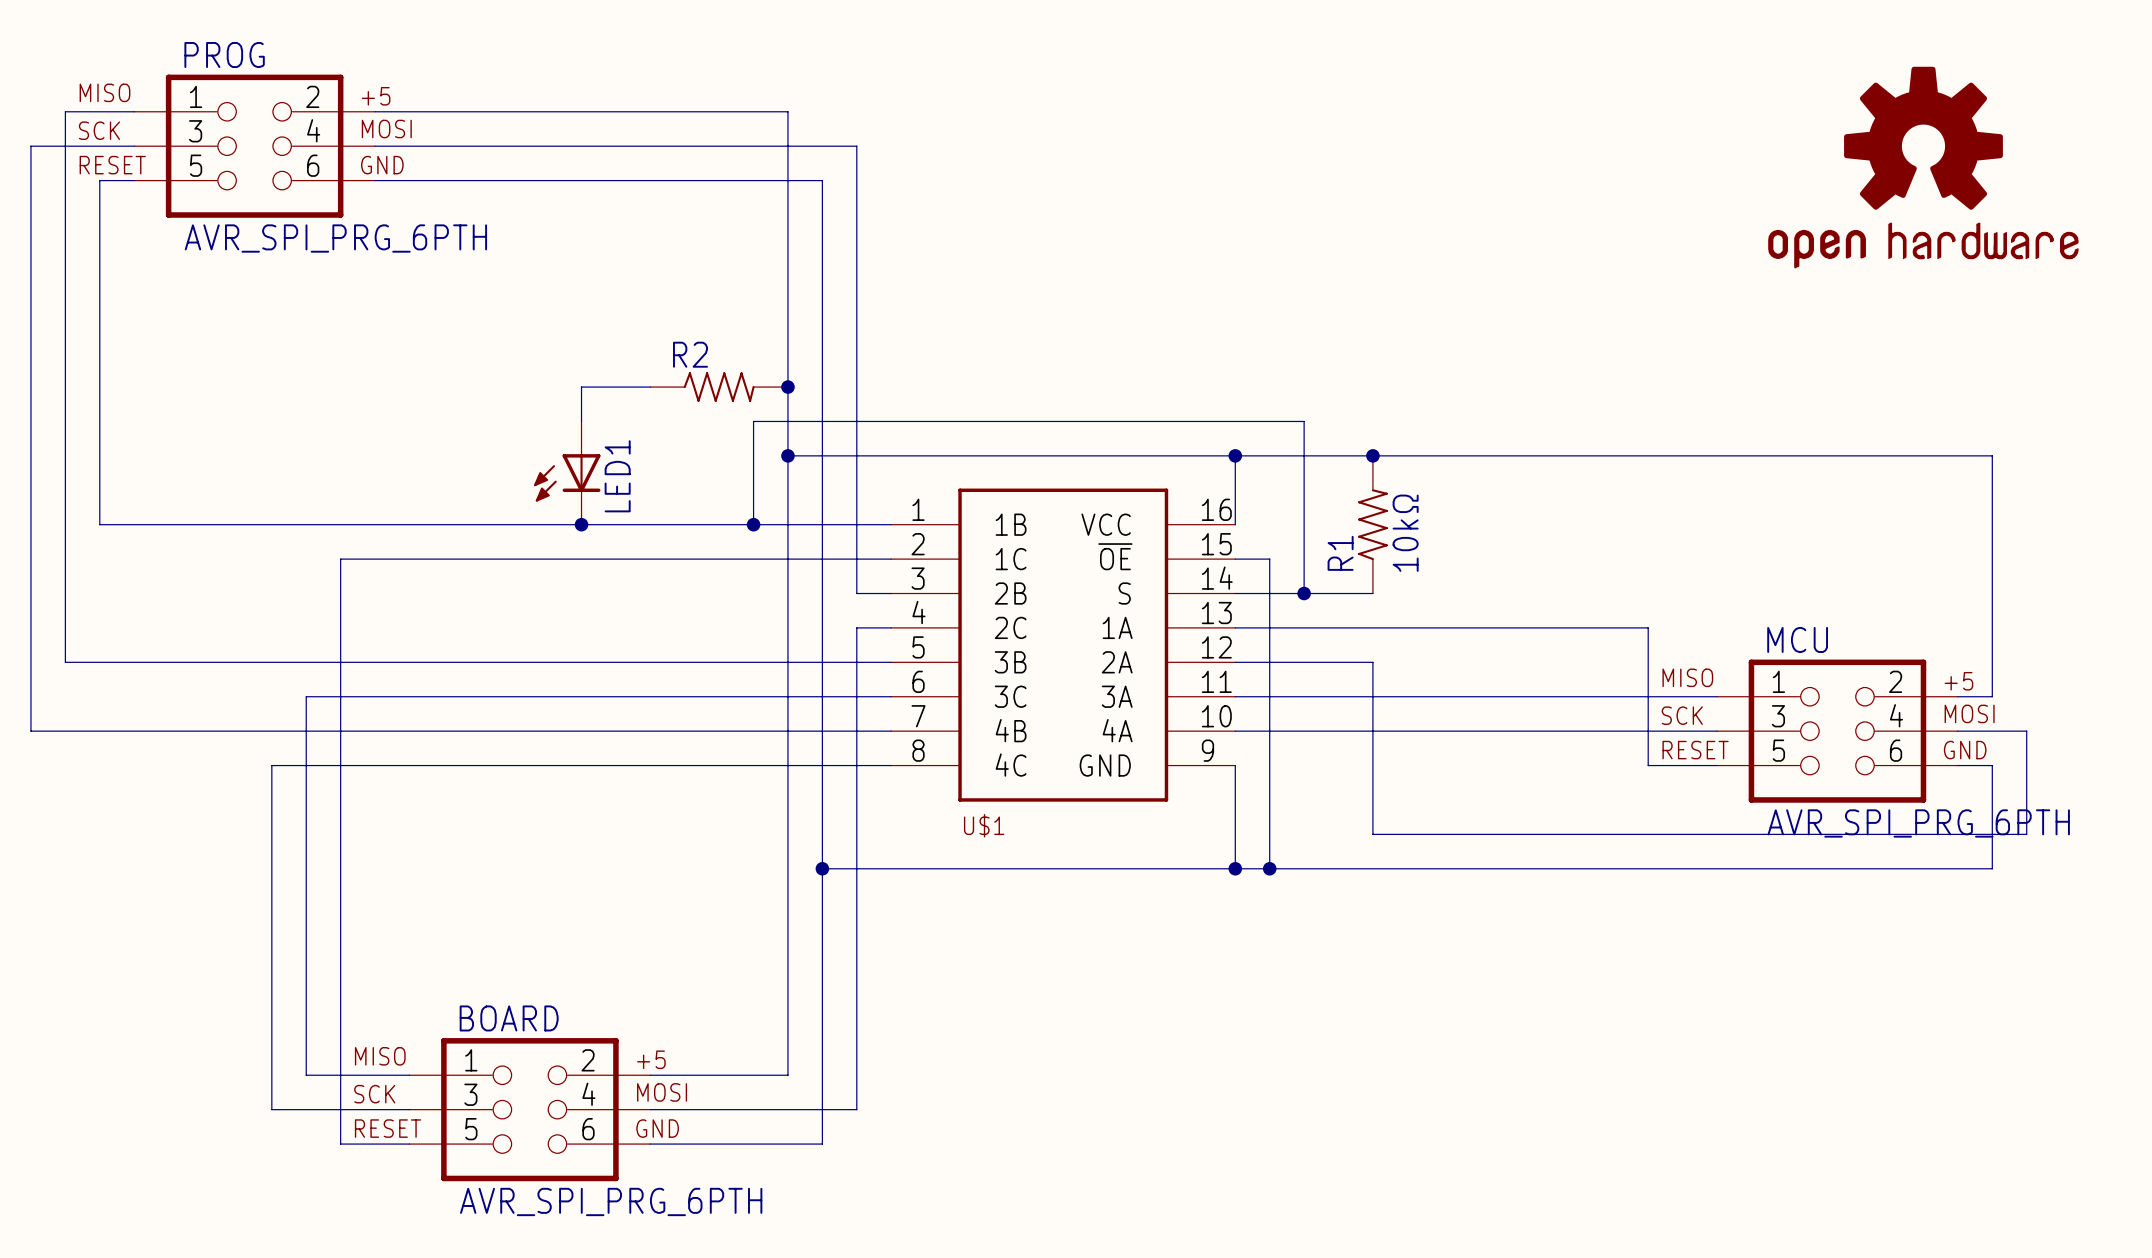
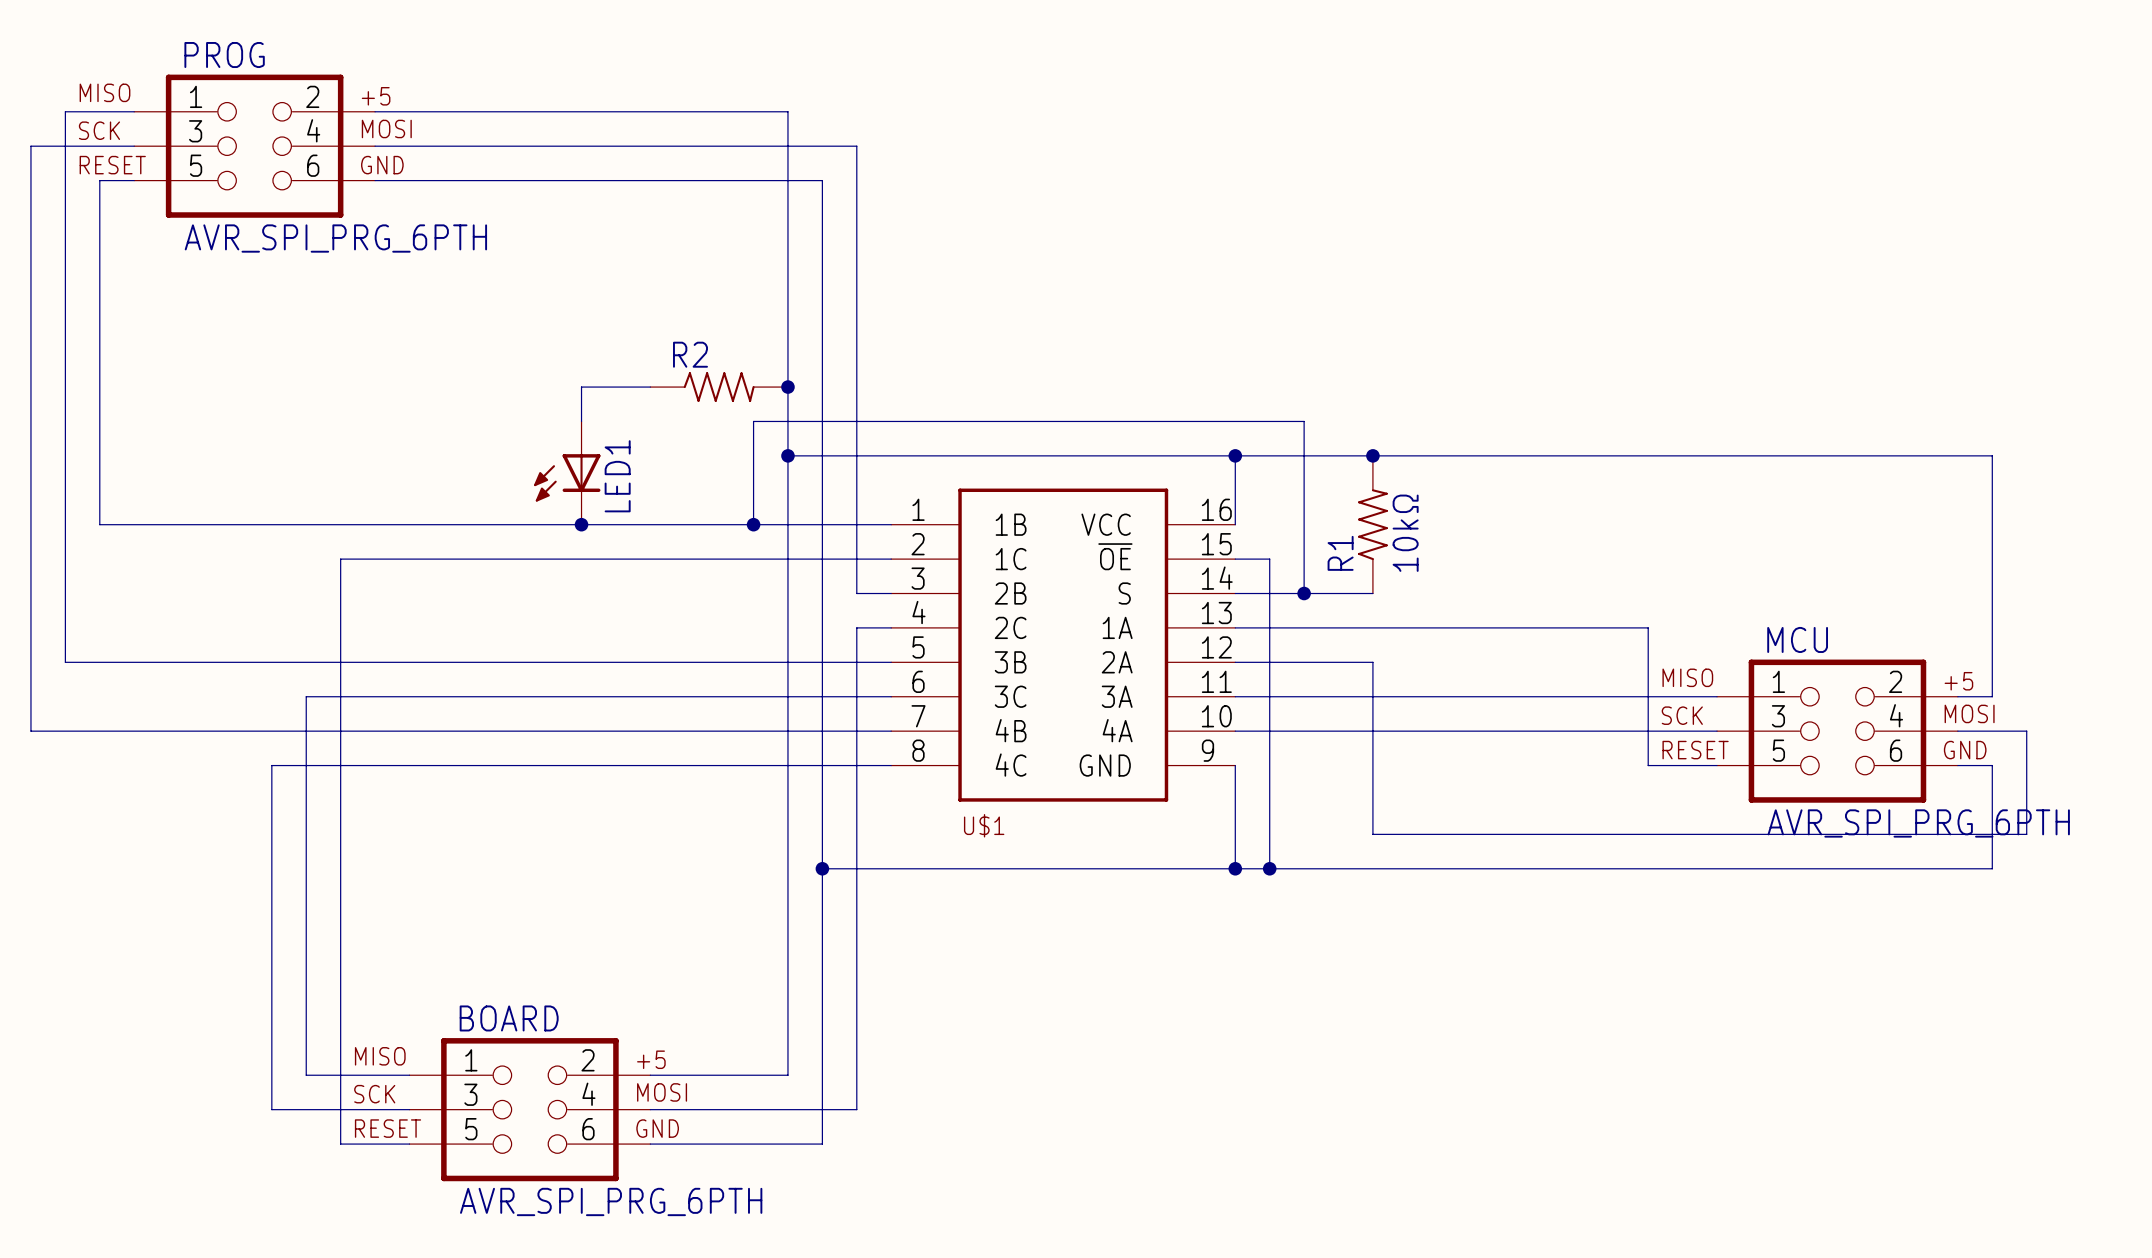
part: (1923, 167) -> none

